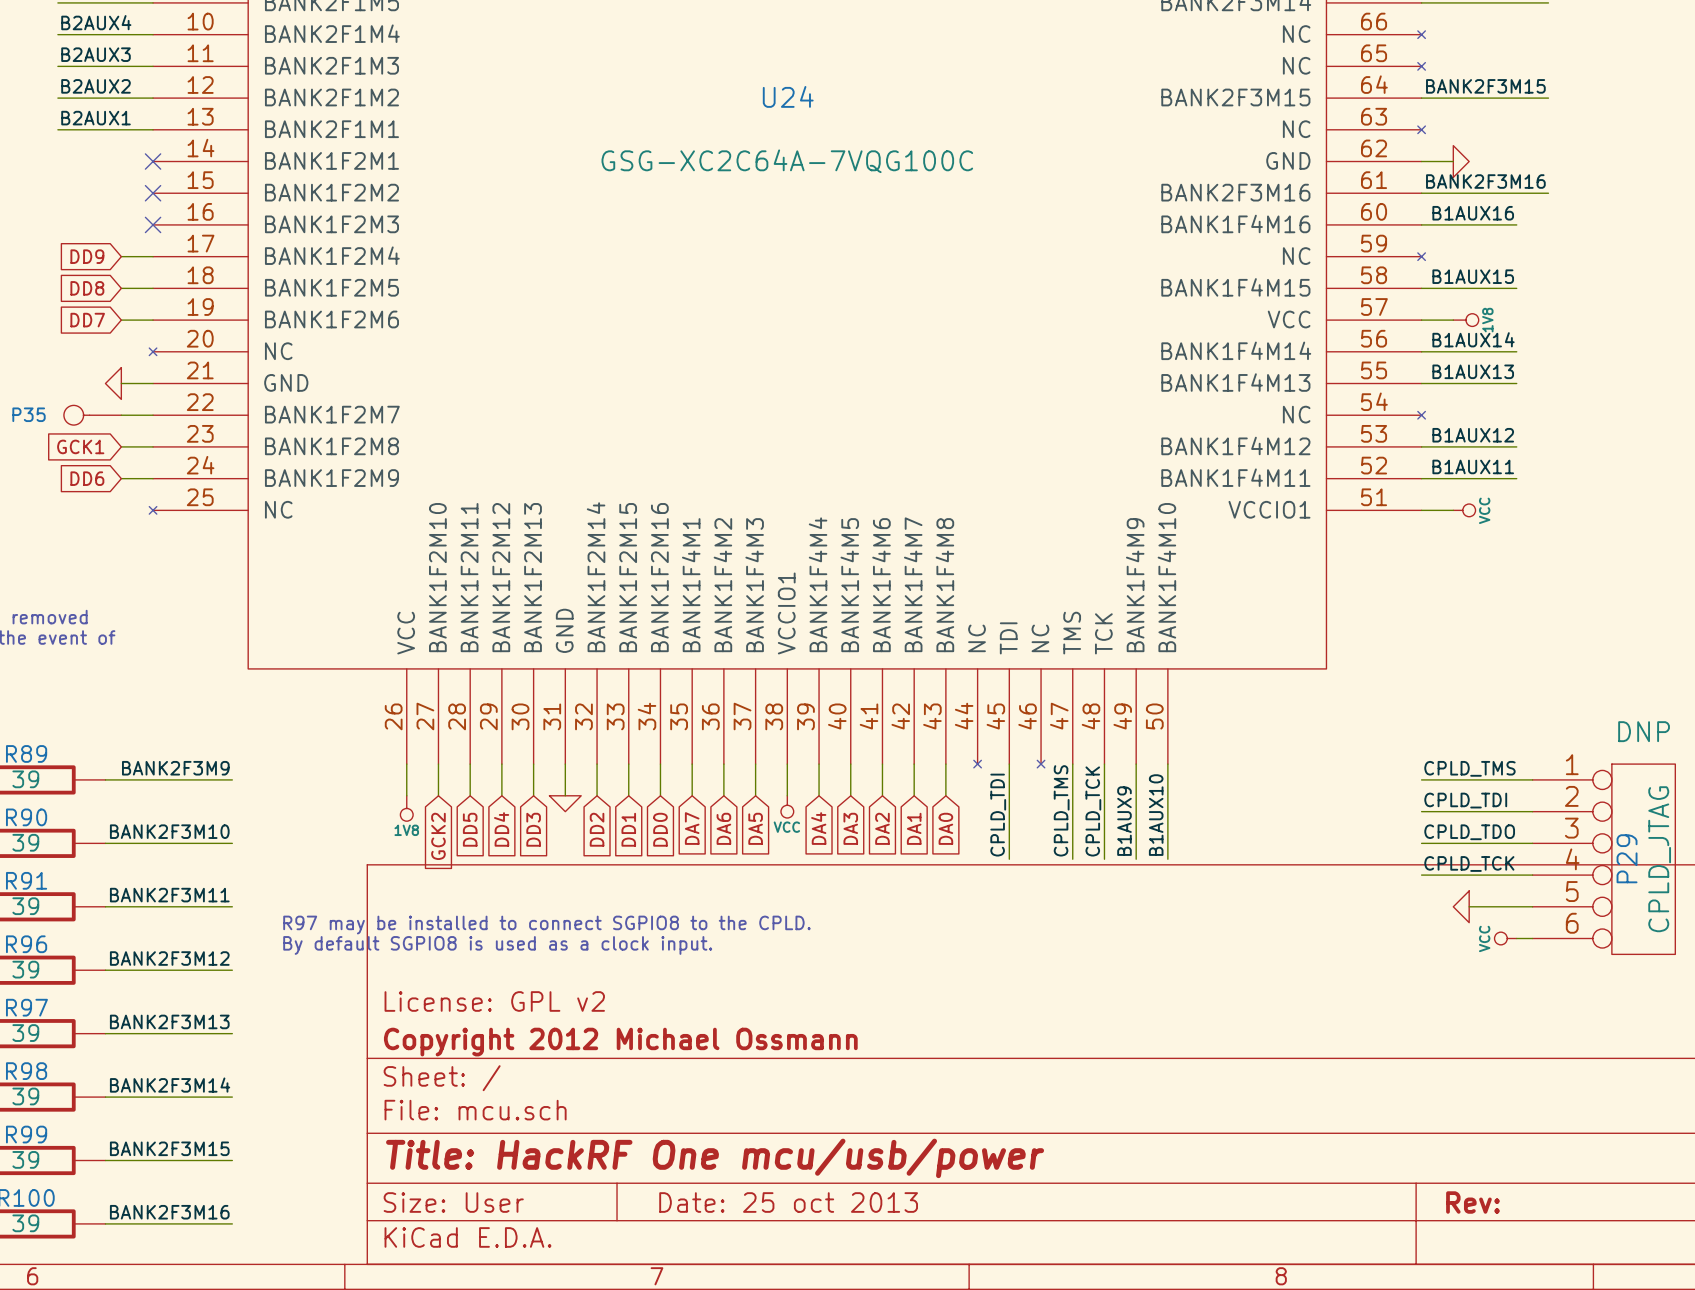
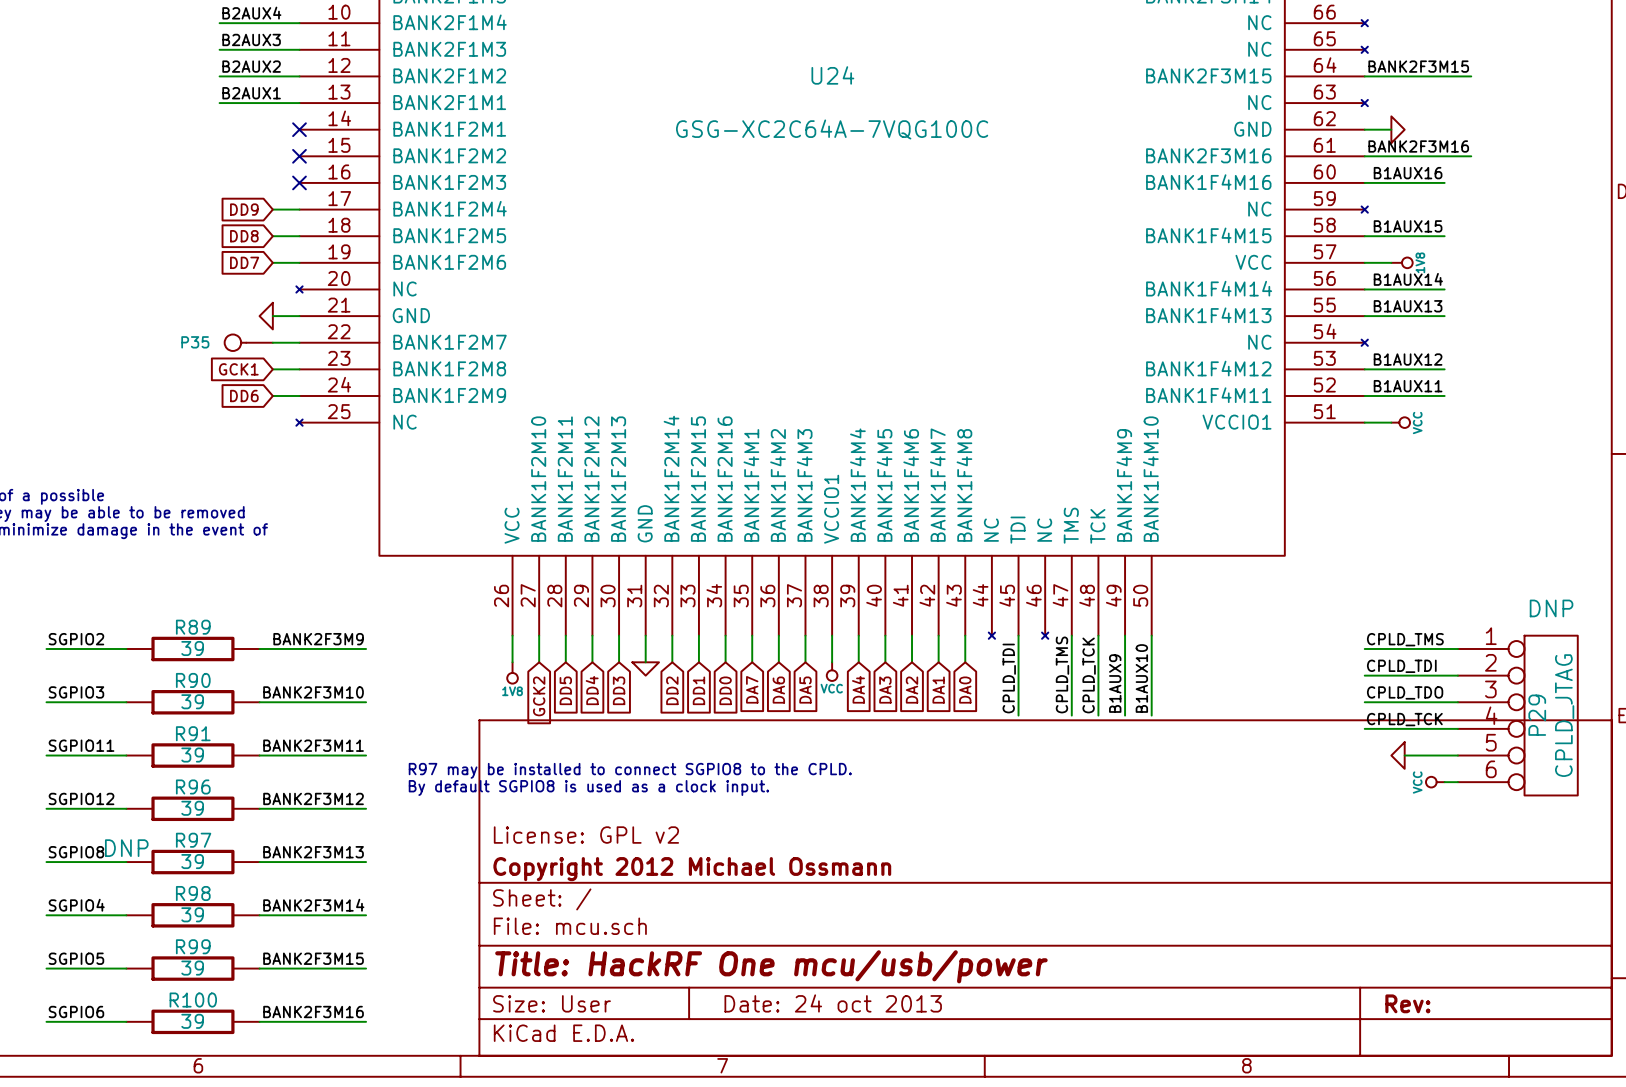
title block: Date: 25 oct 2013 (788, 1202) -> Date: 24 oct 2013 (833, 1003)

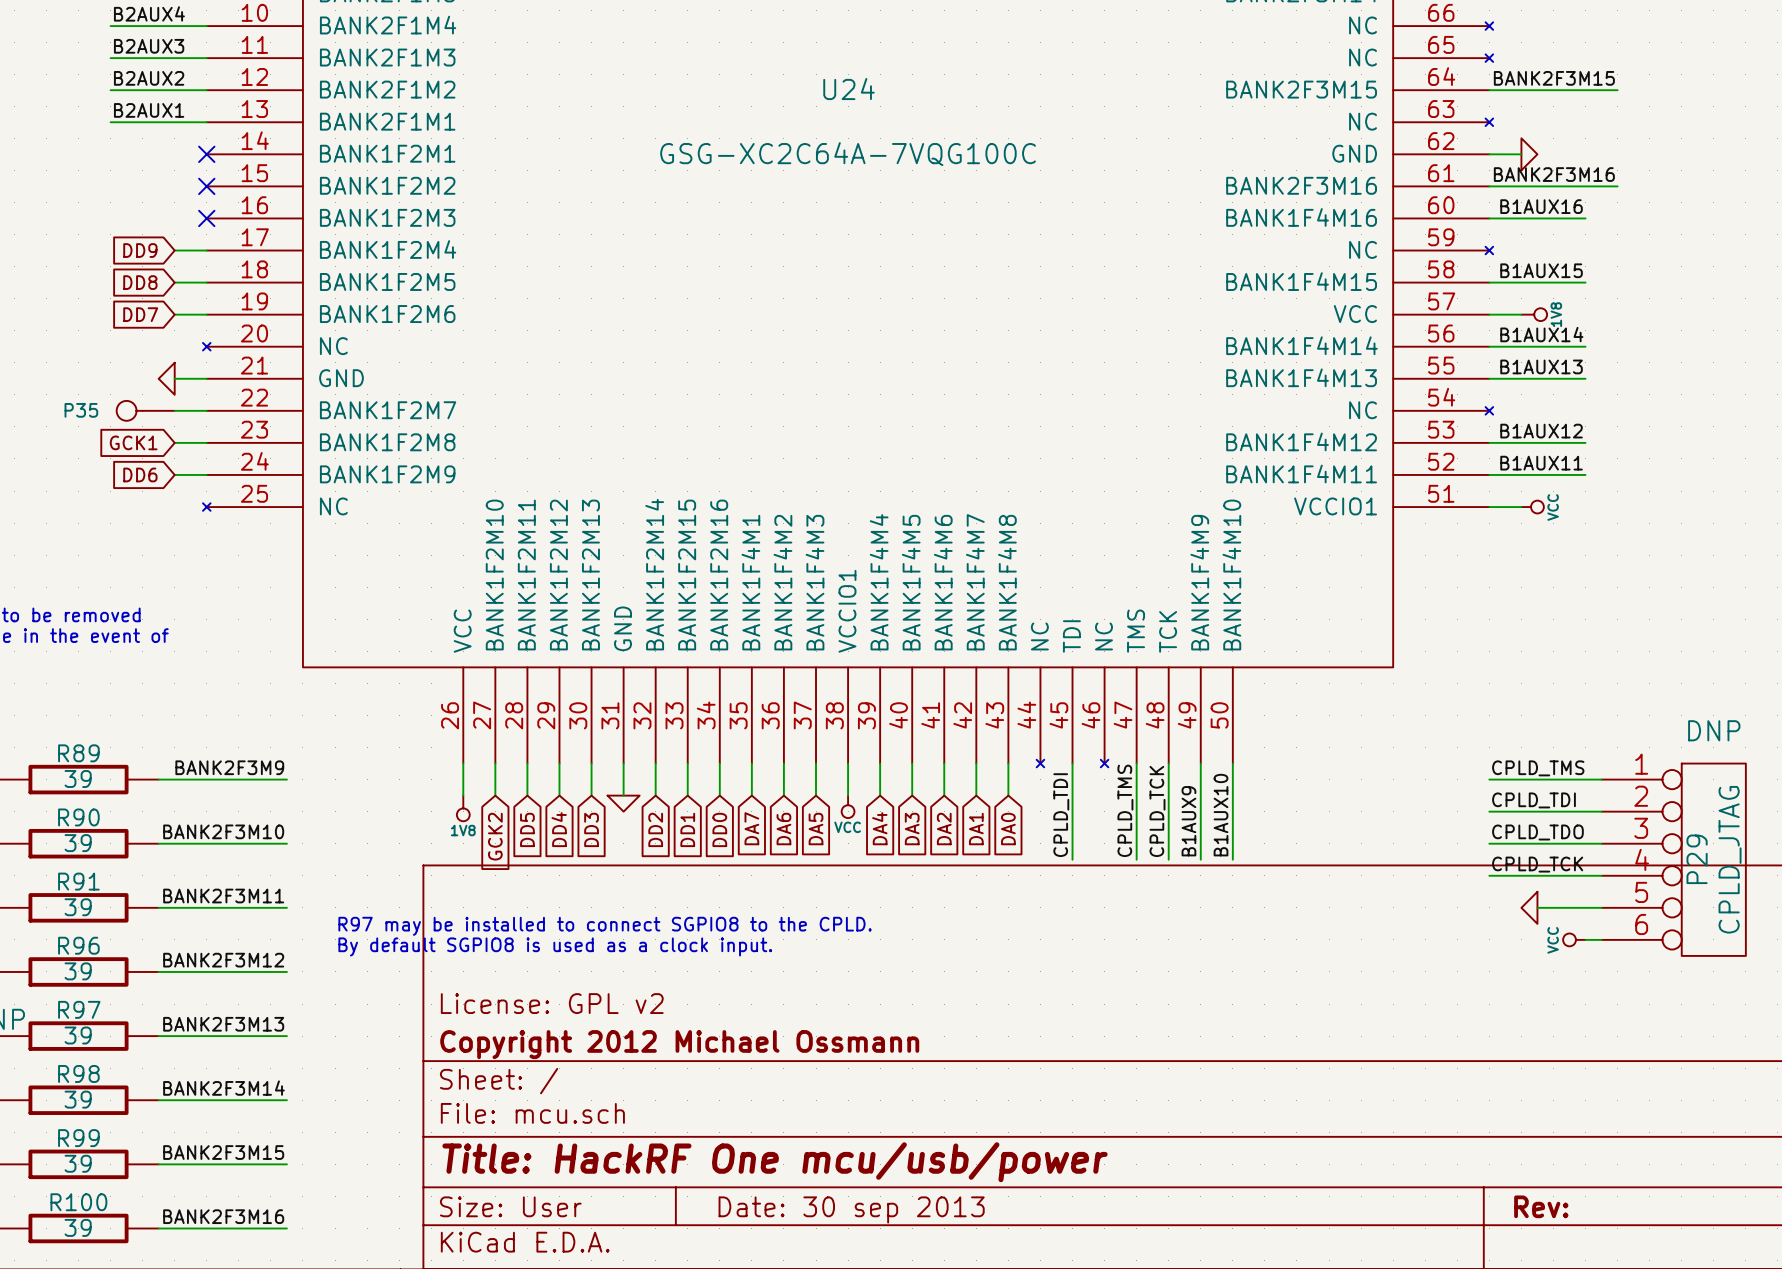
title block: Date: 24 oct 2013 (833, 1003) -> Date: 30 sep 2013 (851, 1209)

